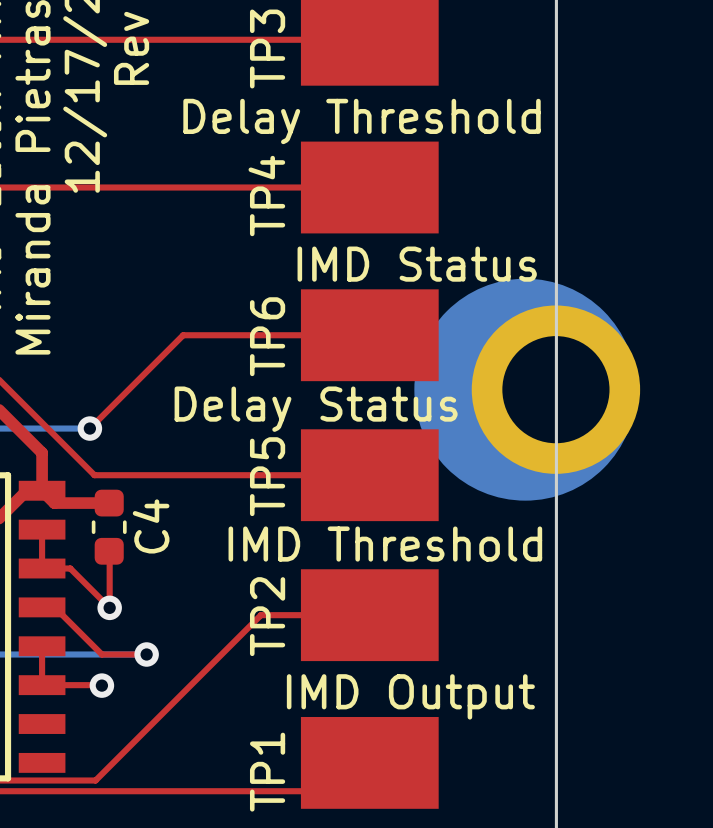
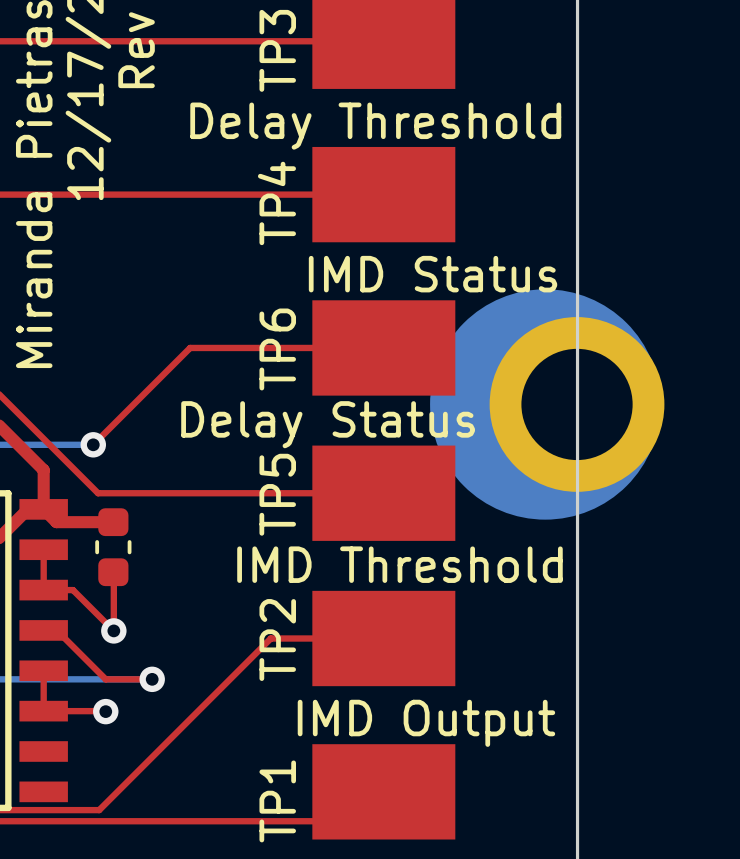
C4 name: C4 (151, 526) -> none

